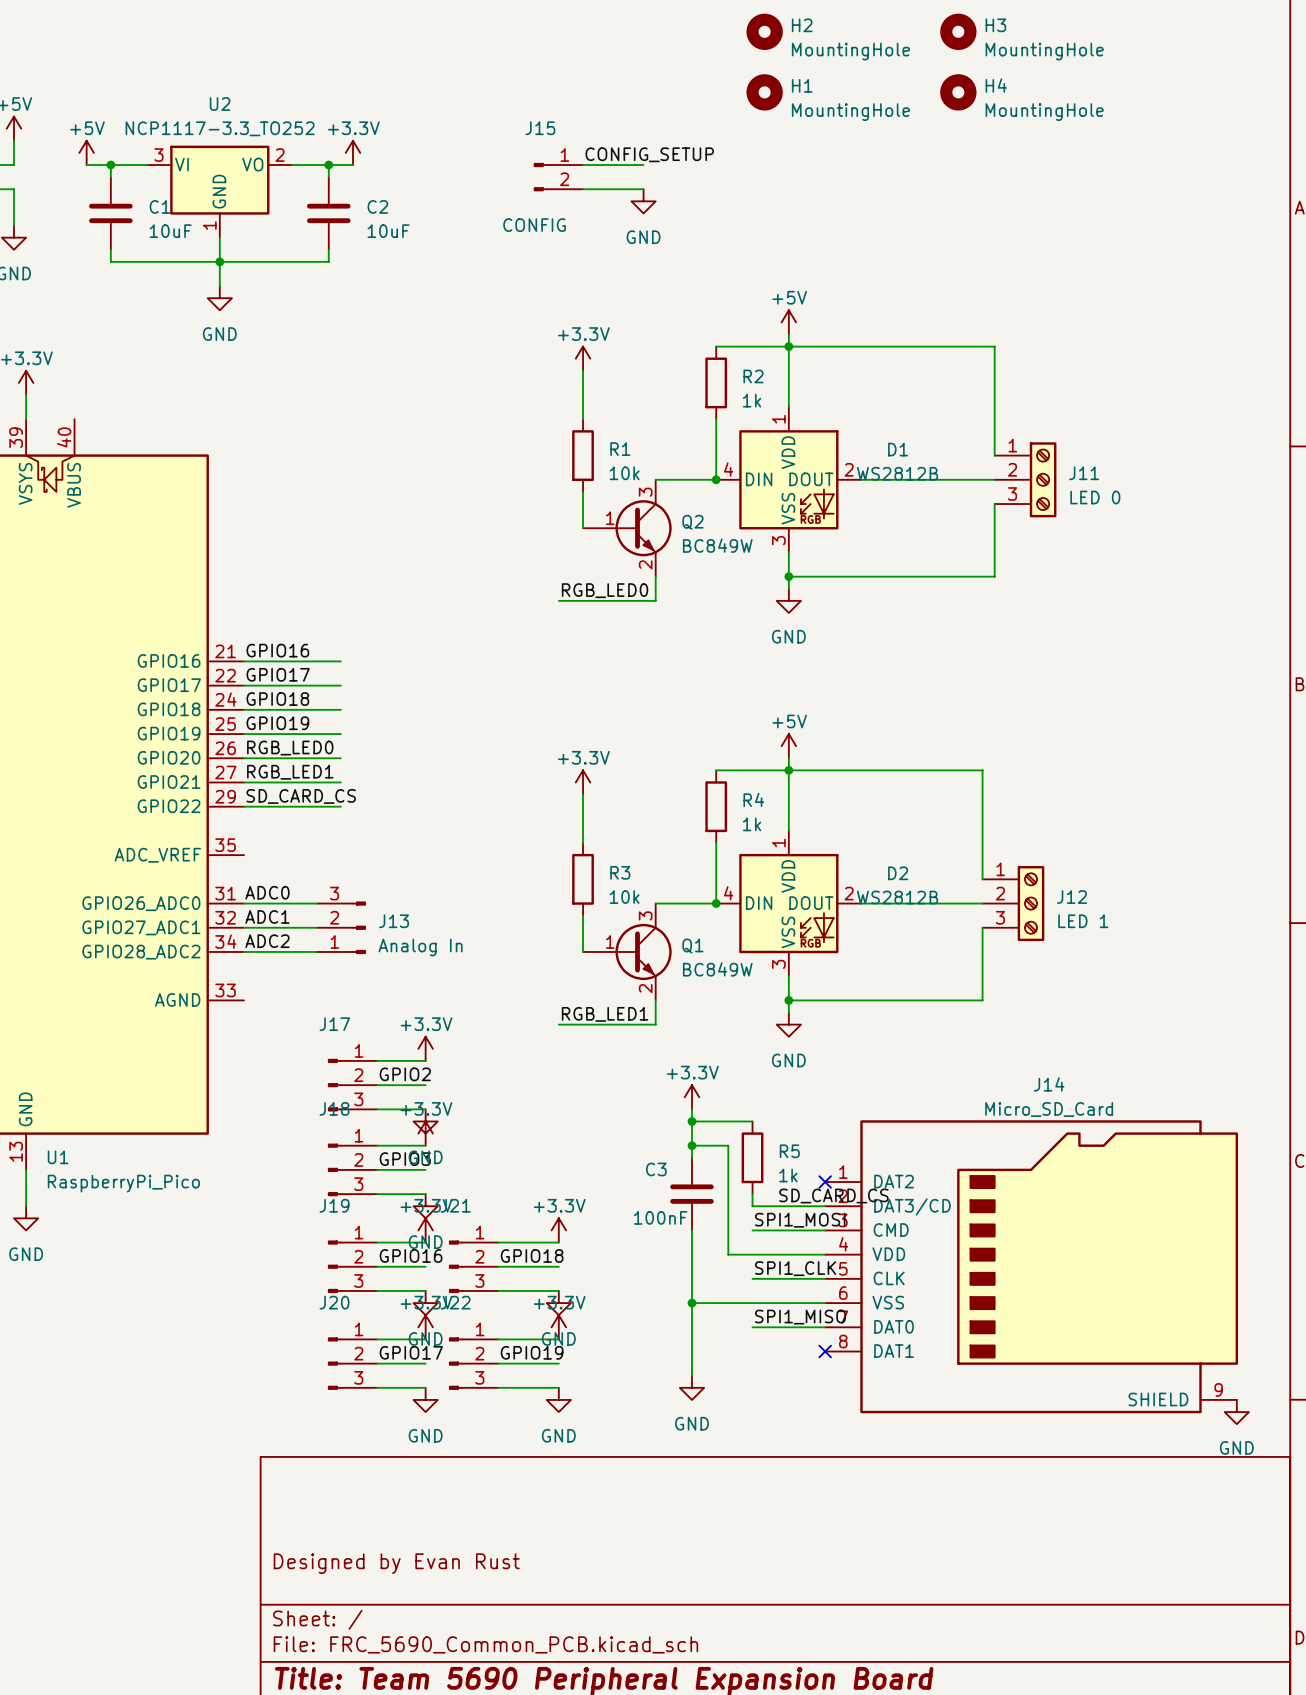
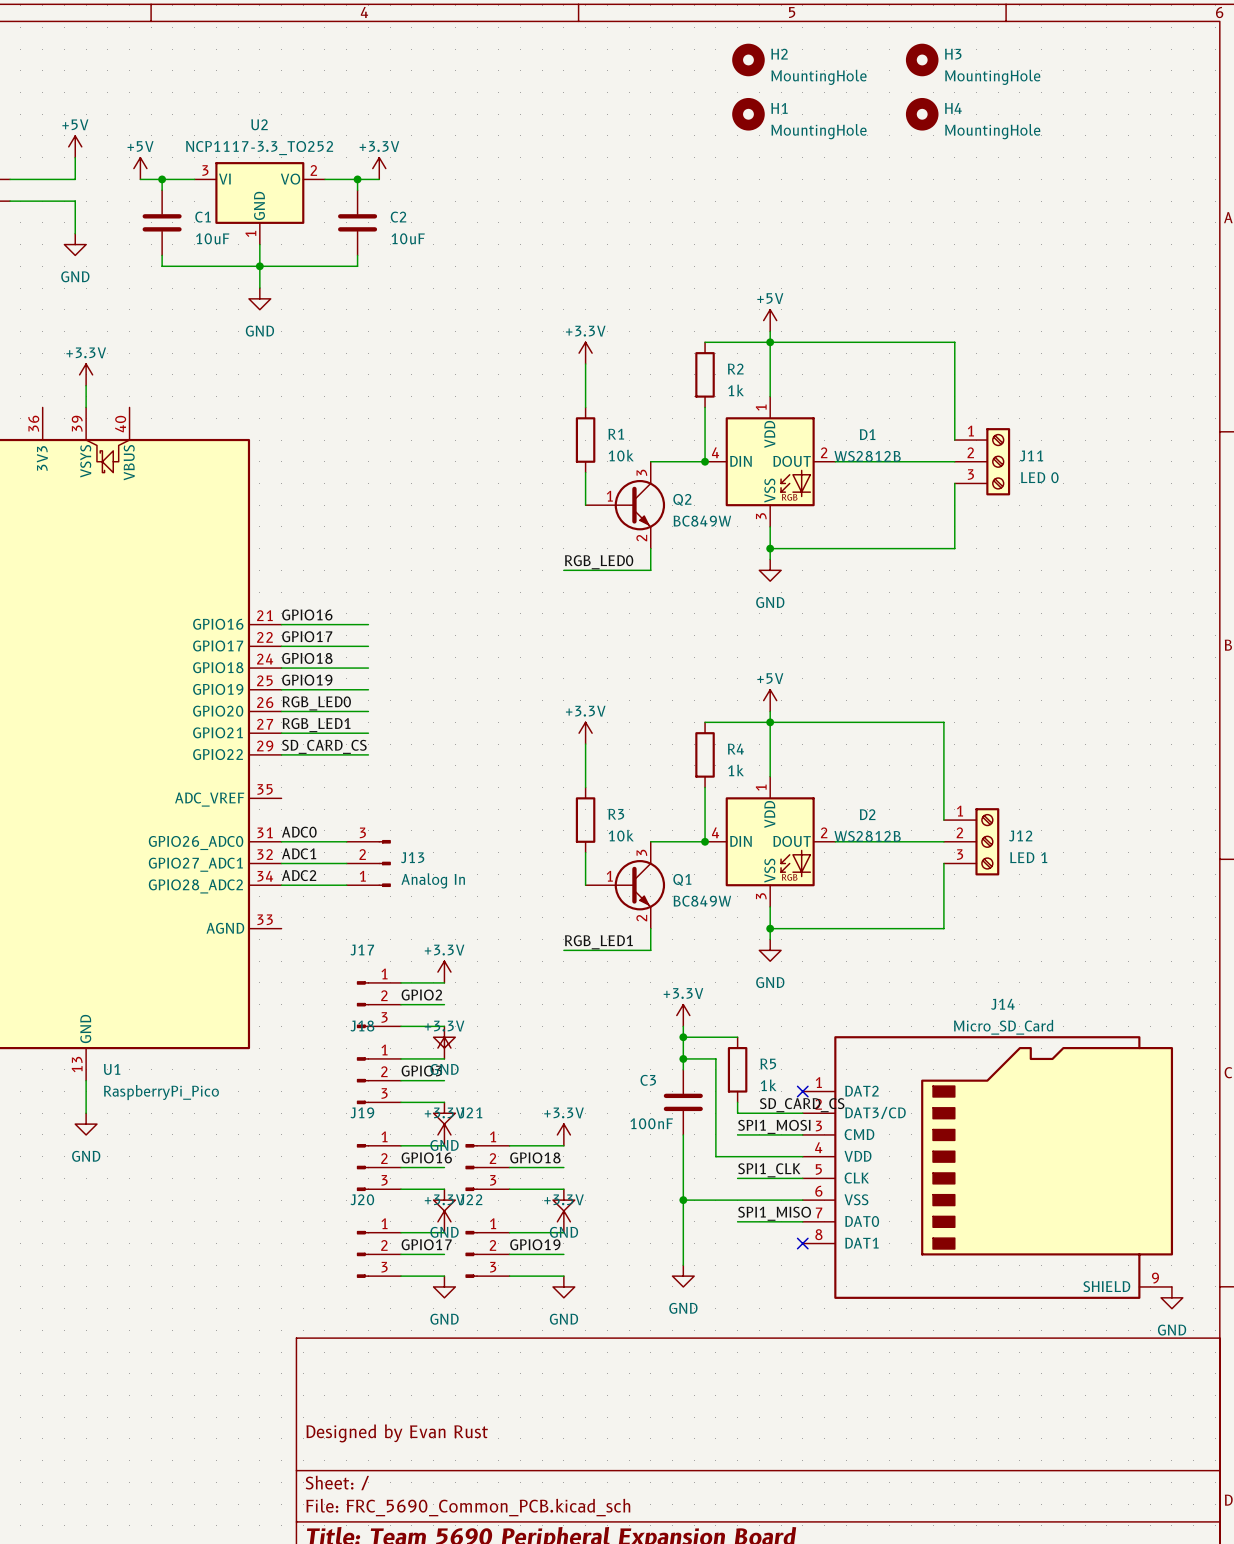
label: CONFIG_SETUP (649, 154) -> none
wire: (583, 165) (643, 165) -> none
J15: CONFIG (558, 177) -> none
wire: (583, 189) (643, 189) -> none
power symbol: GND (643, 201) -> none

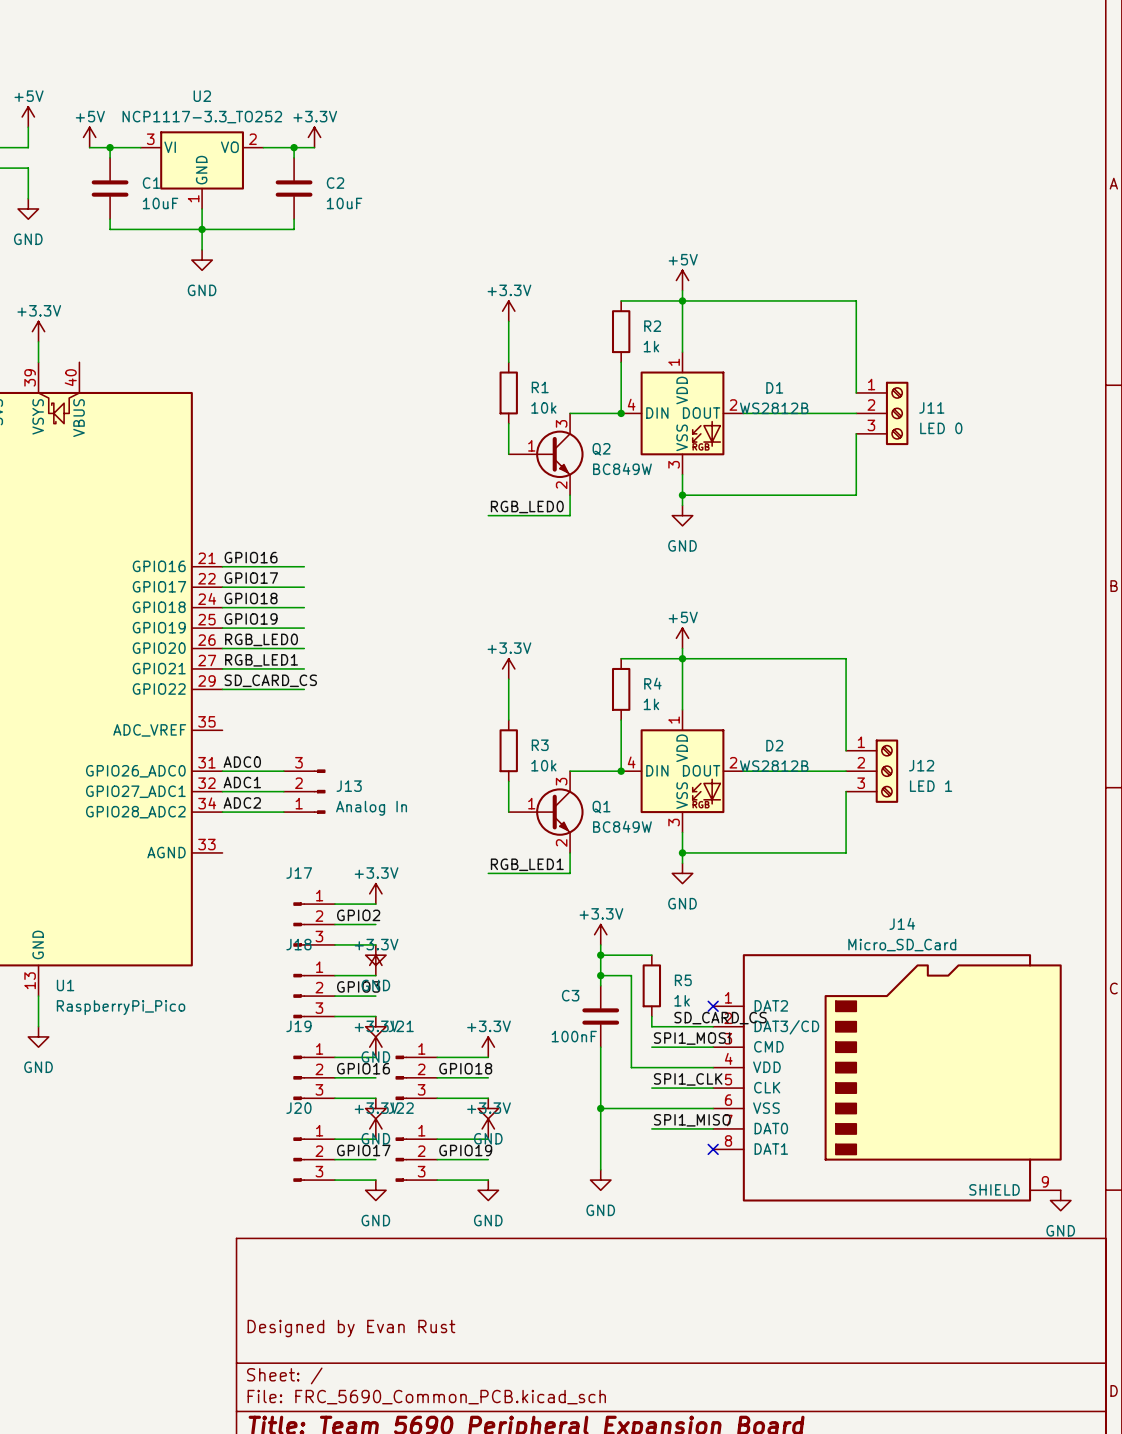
H2: MountingHole (748, 59) -> none
H3: MountingHole (922, 59) -> none
H1: MountingHole (748, 114) -> none
H4: MountingHole (922, 114) -> none

